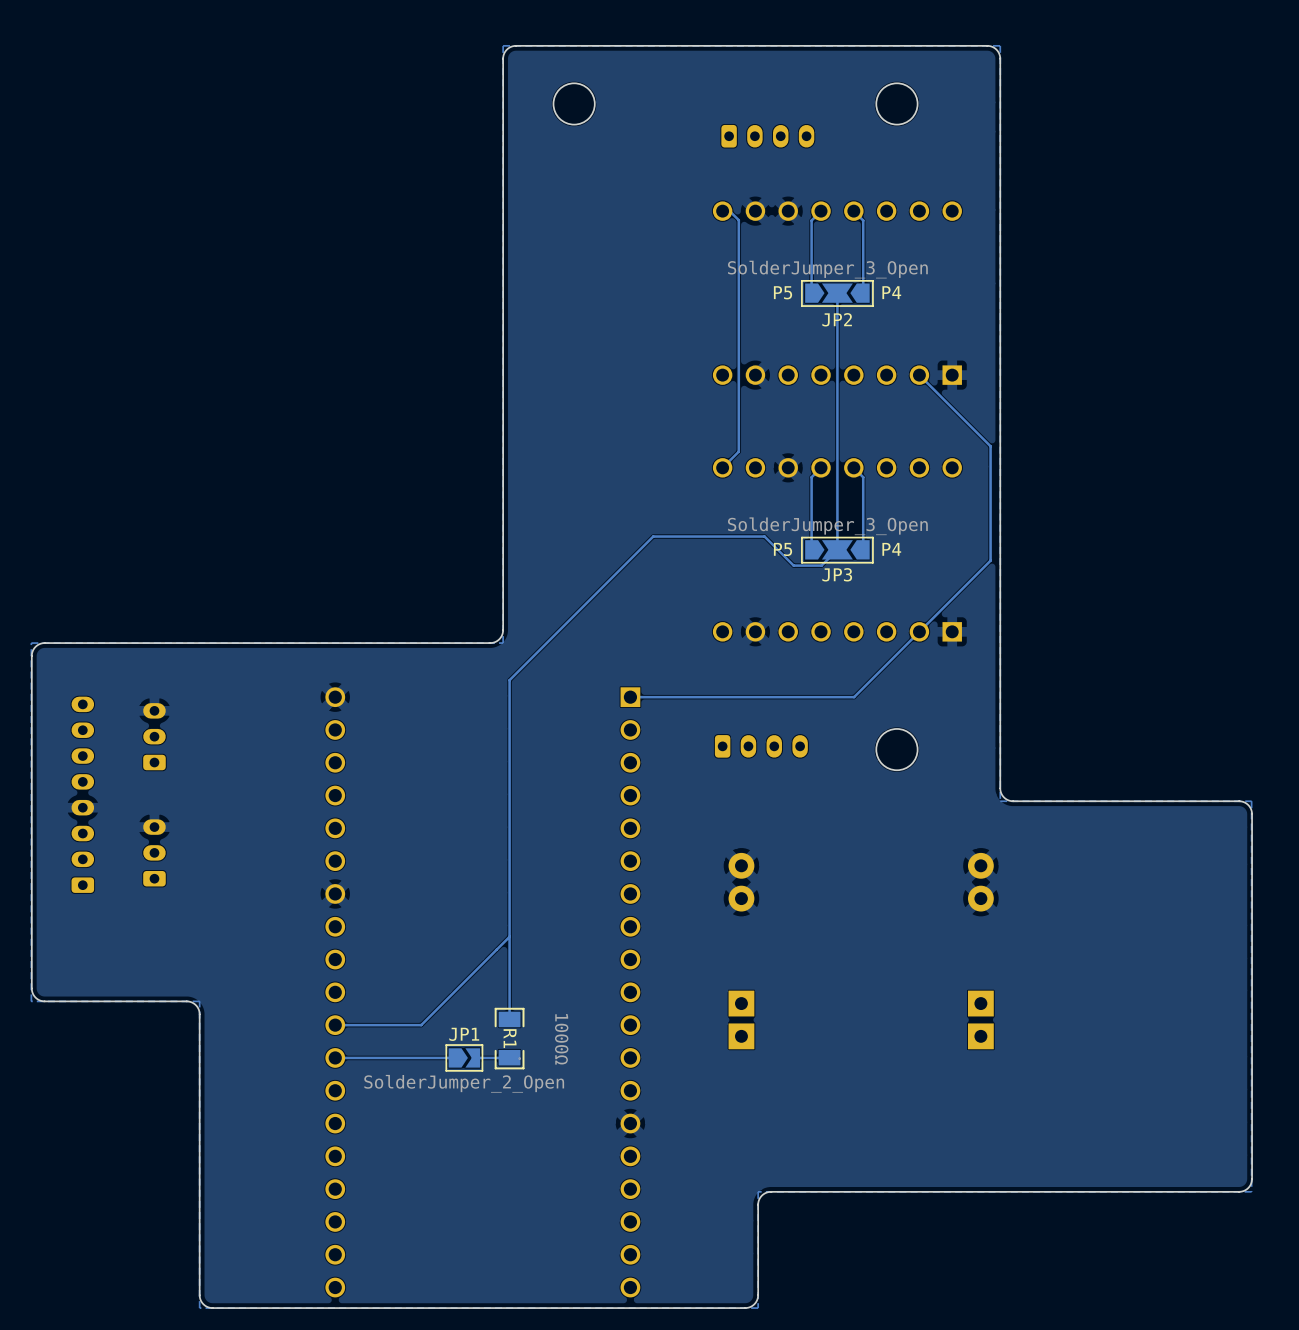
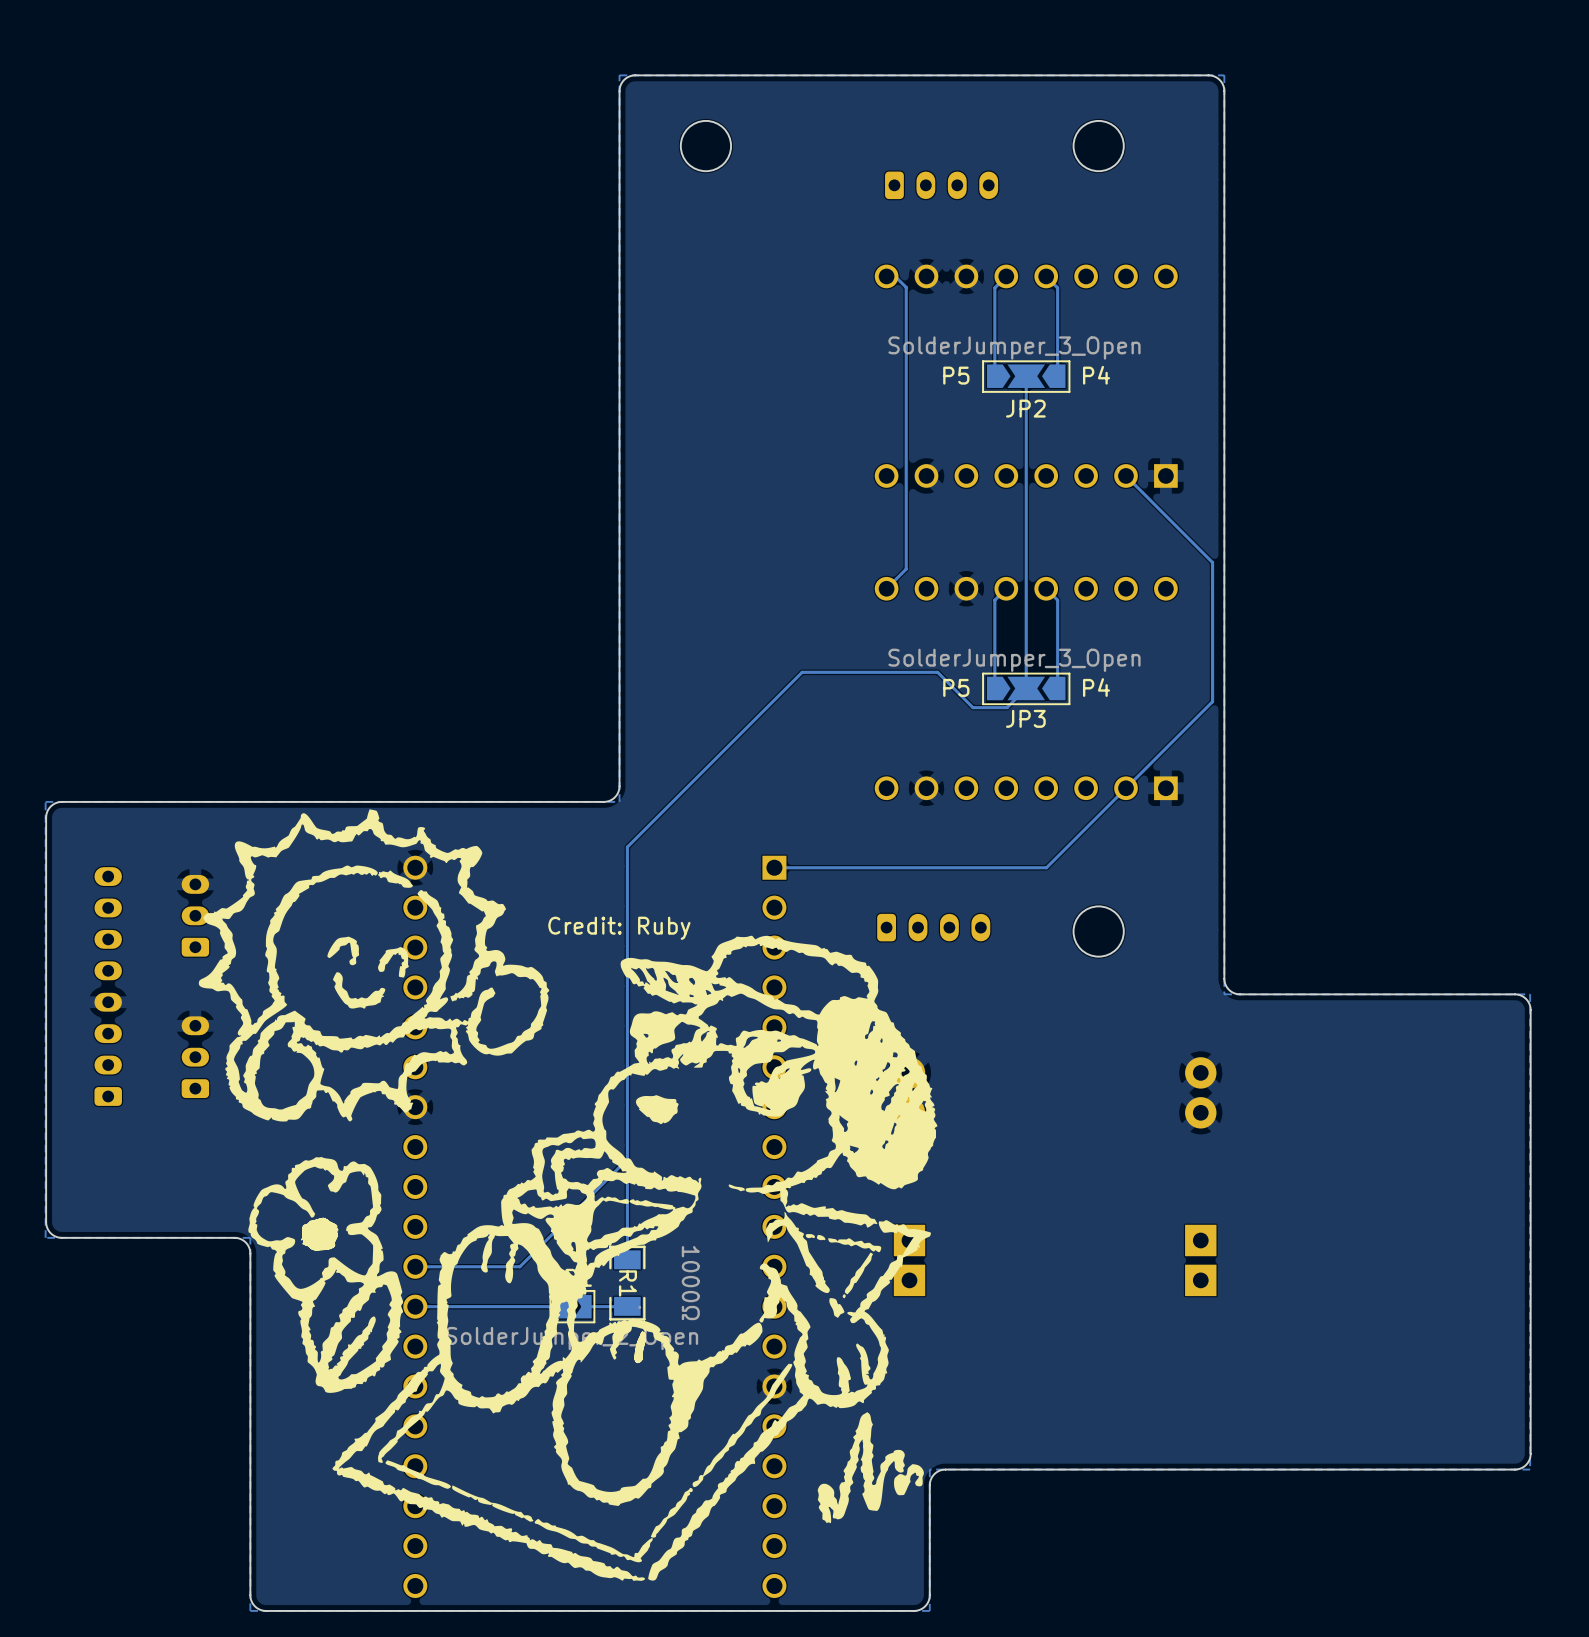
drawing: none -> [198, 809, 938, 1581]
text: none -> Credit: Ruby (619, 928)

